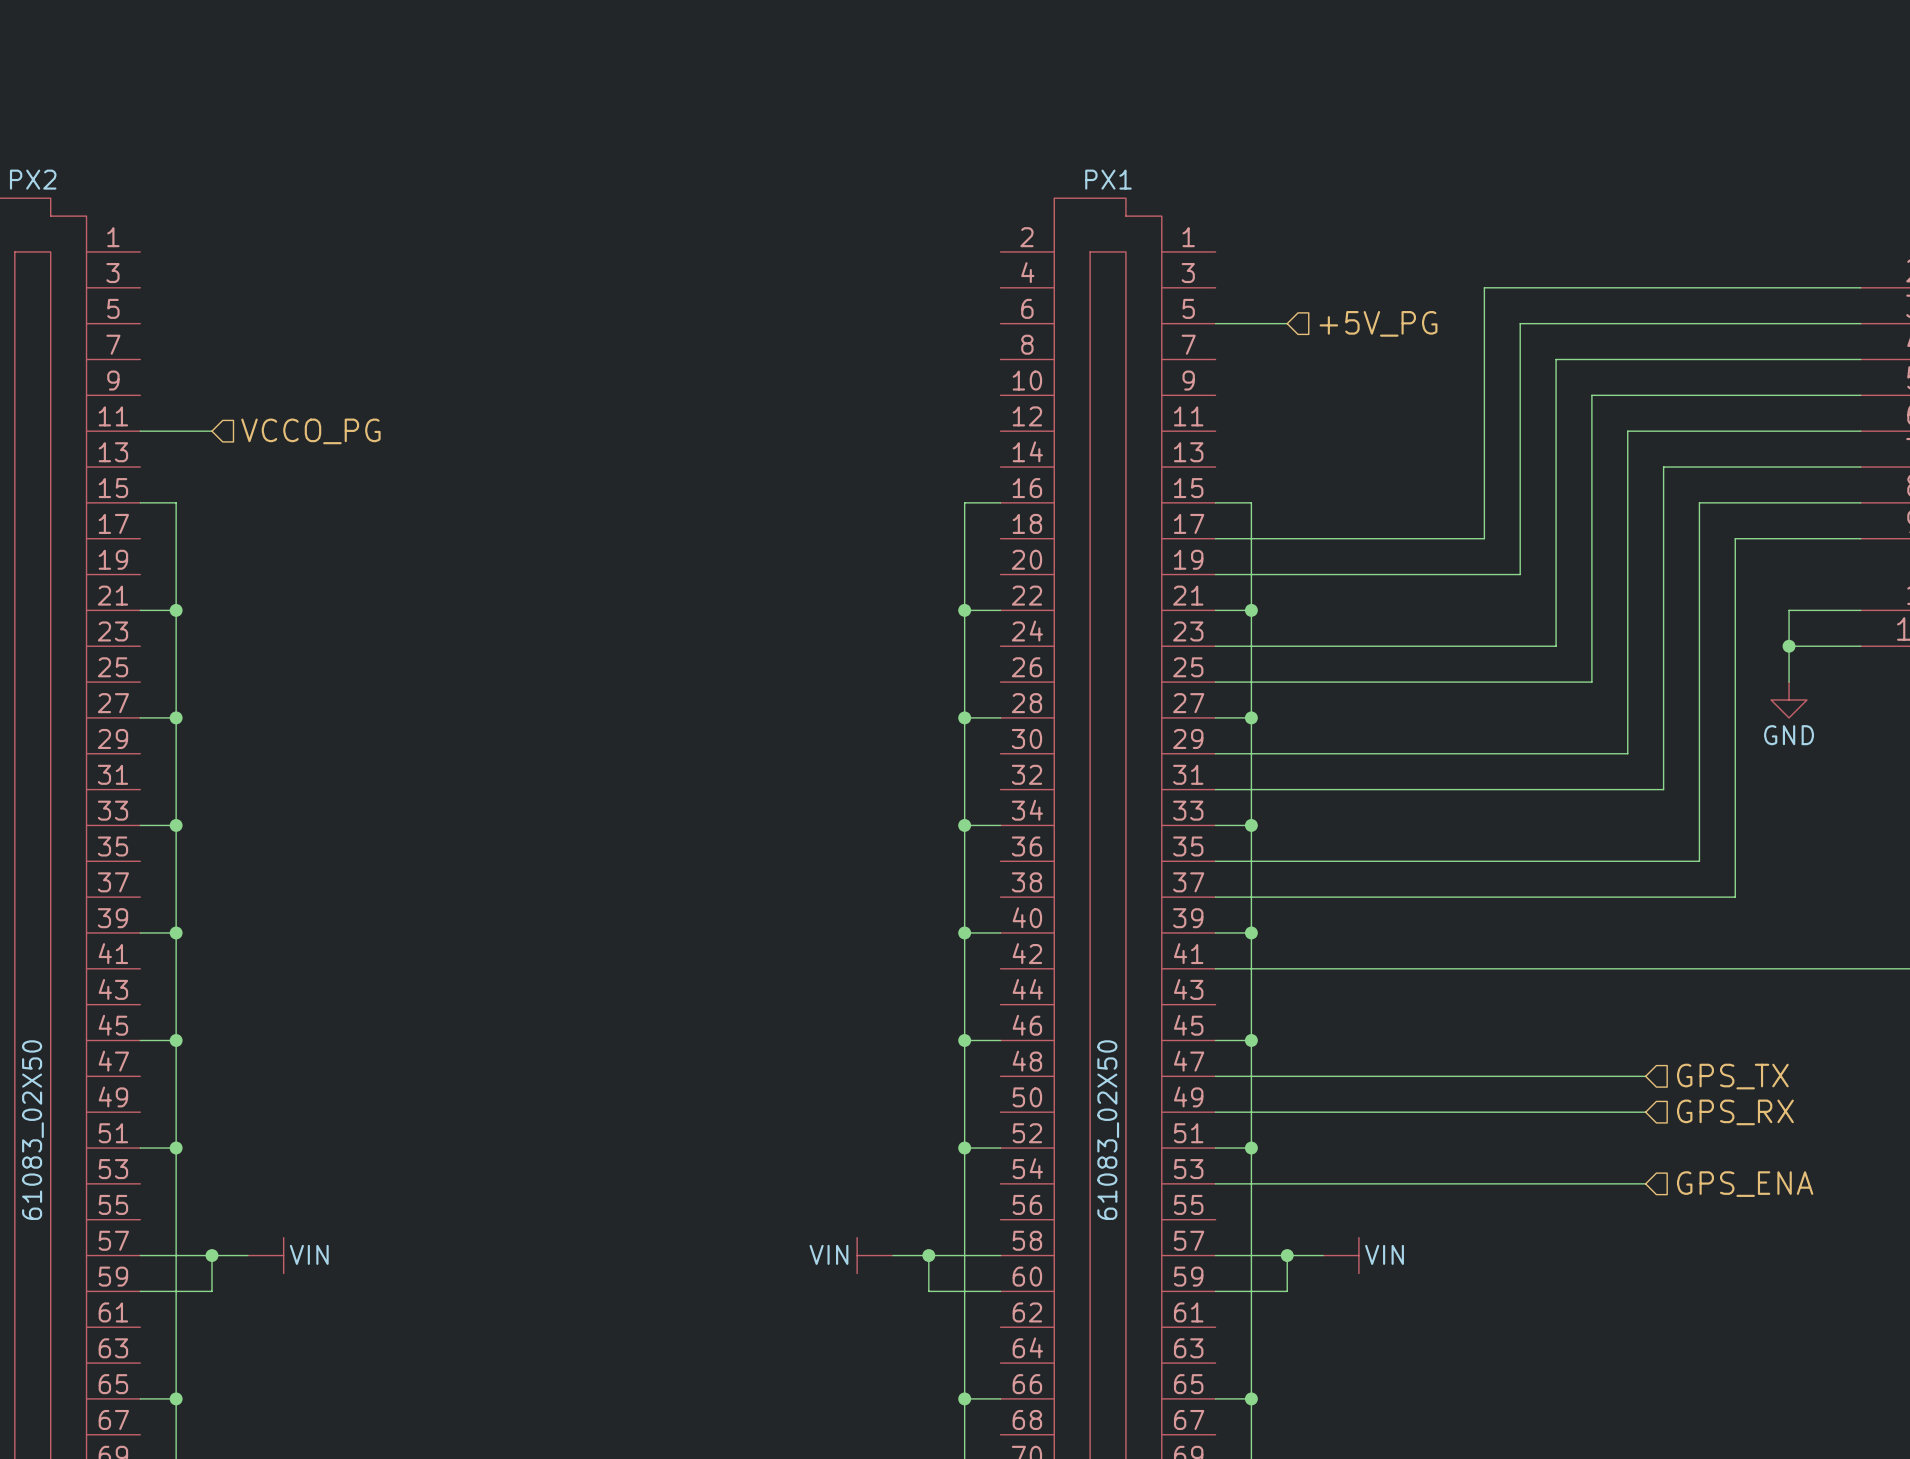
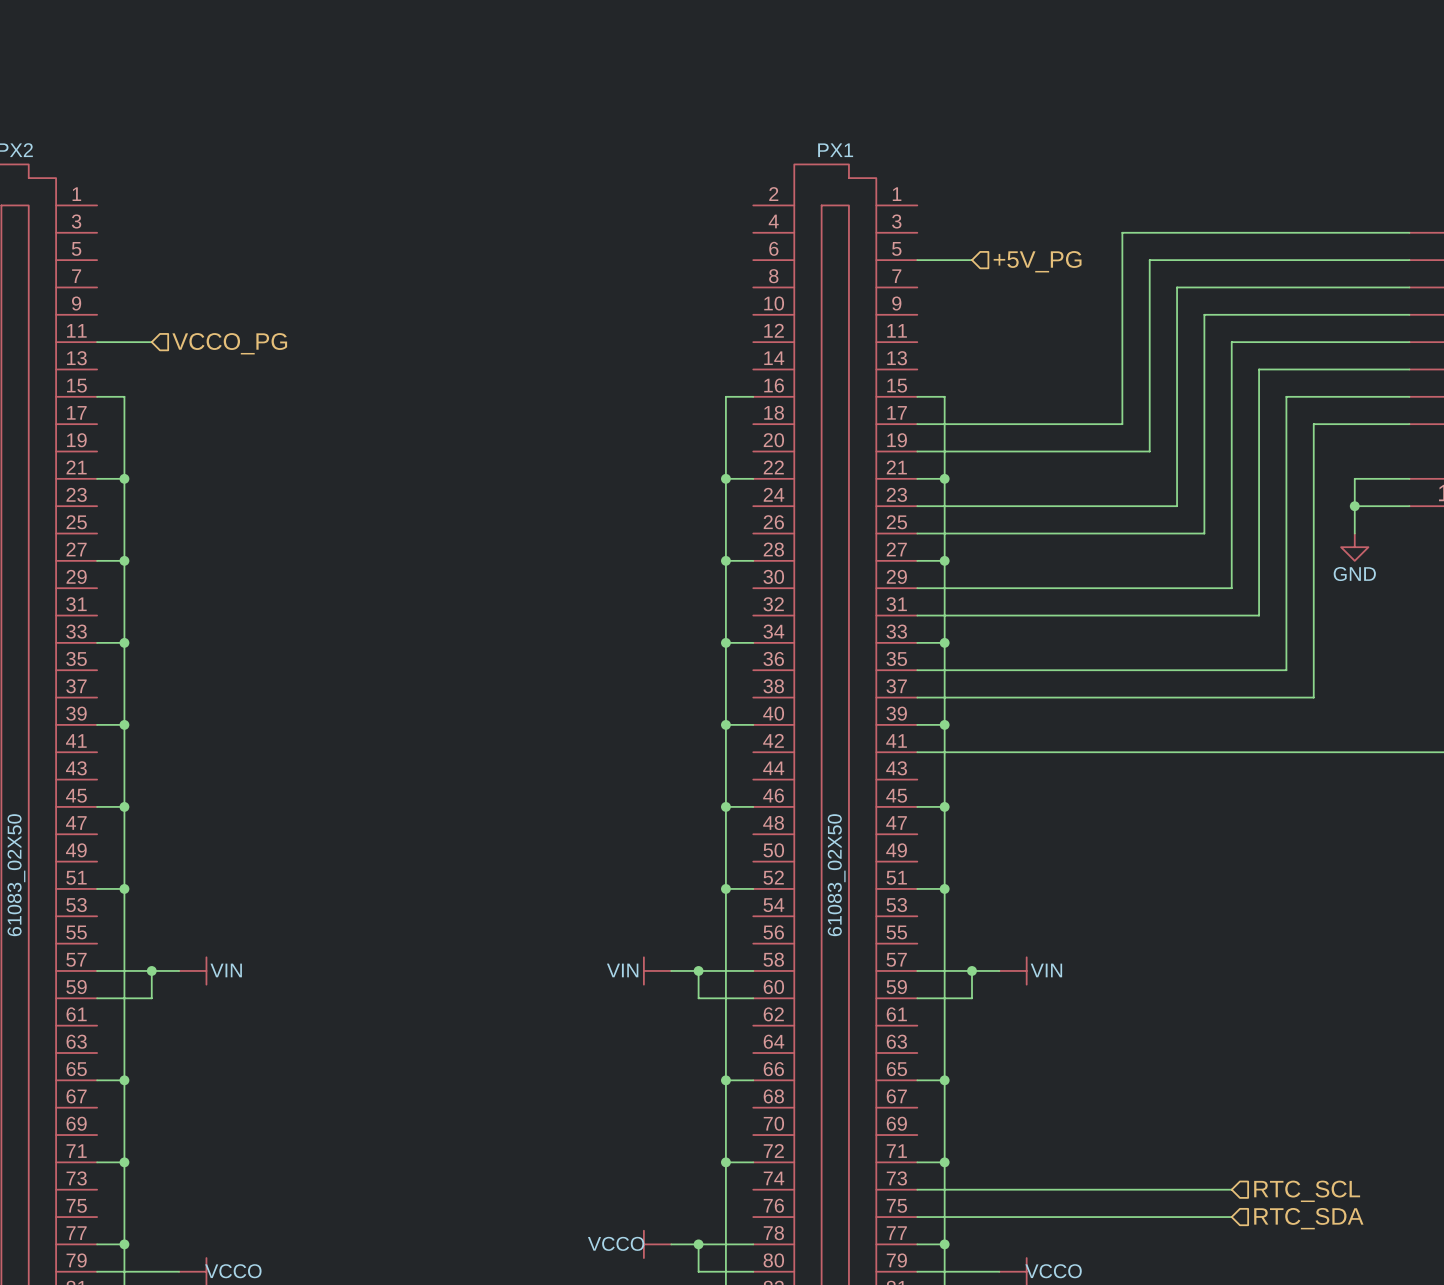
wire: (1215, 1076) (1645, 1076) -> none
hierarchical label: GPS_TX (1732, 1076) -> none
wire: (1215, 1112) (1645, 1112) -> none
hierarchical label: GPS_RX (1735, 1112) -> none
wire: (1215, 1183) (1645, 1183) -> none
hierarchical label: GPS_ENA (1745, 1184) -> none

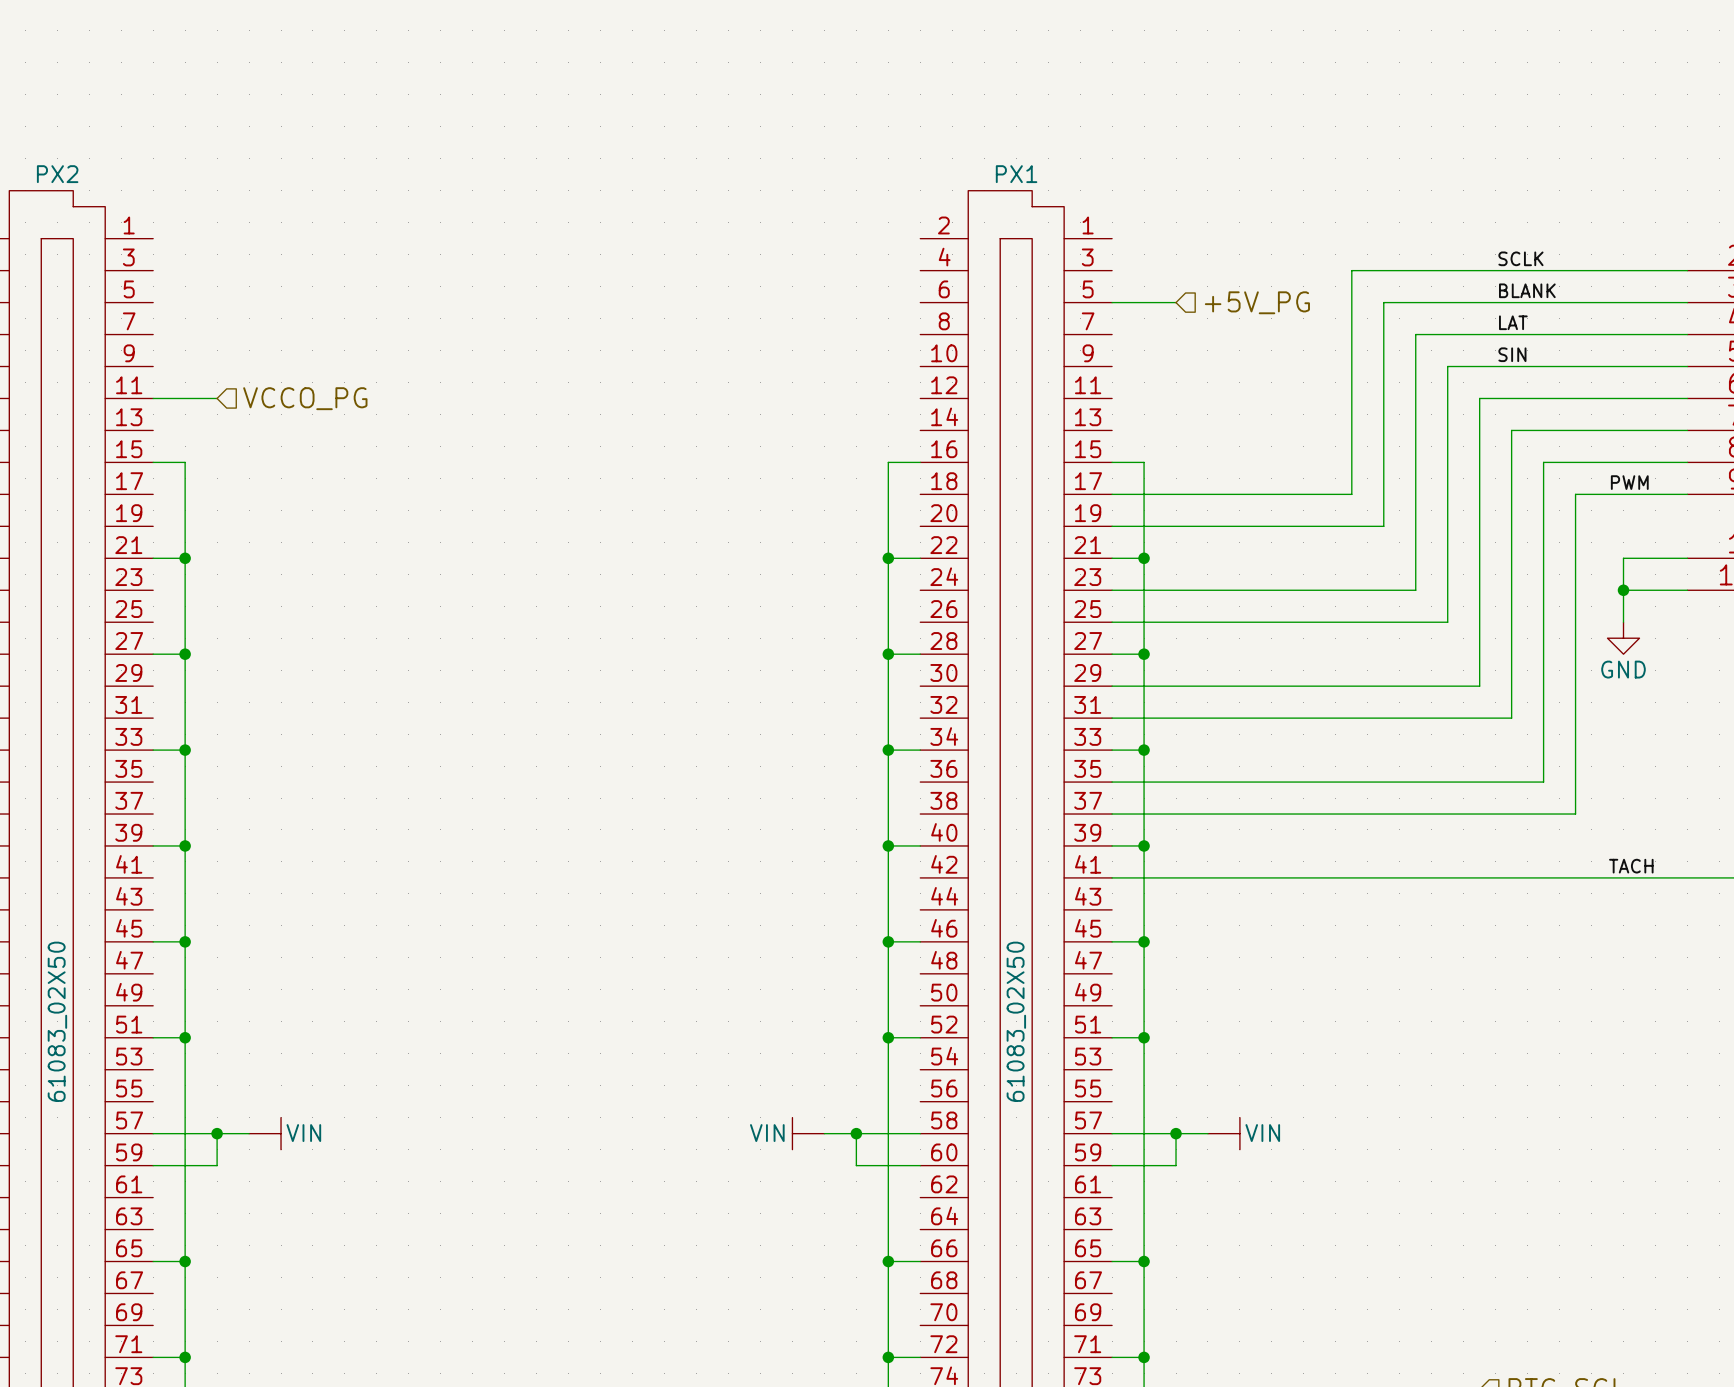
label: none -> SCLK (1520, 258)
label: none -> BLANK (1527, 290)
label: none -> LAT (1513, 322)
label: none -> SIN (1512, 354)
label: none -> PWM (1629, 482)
label: none -> TACH (1631, 866)

